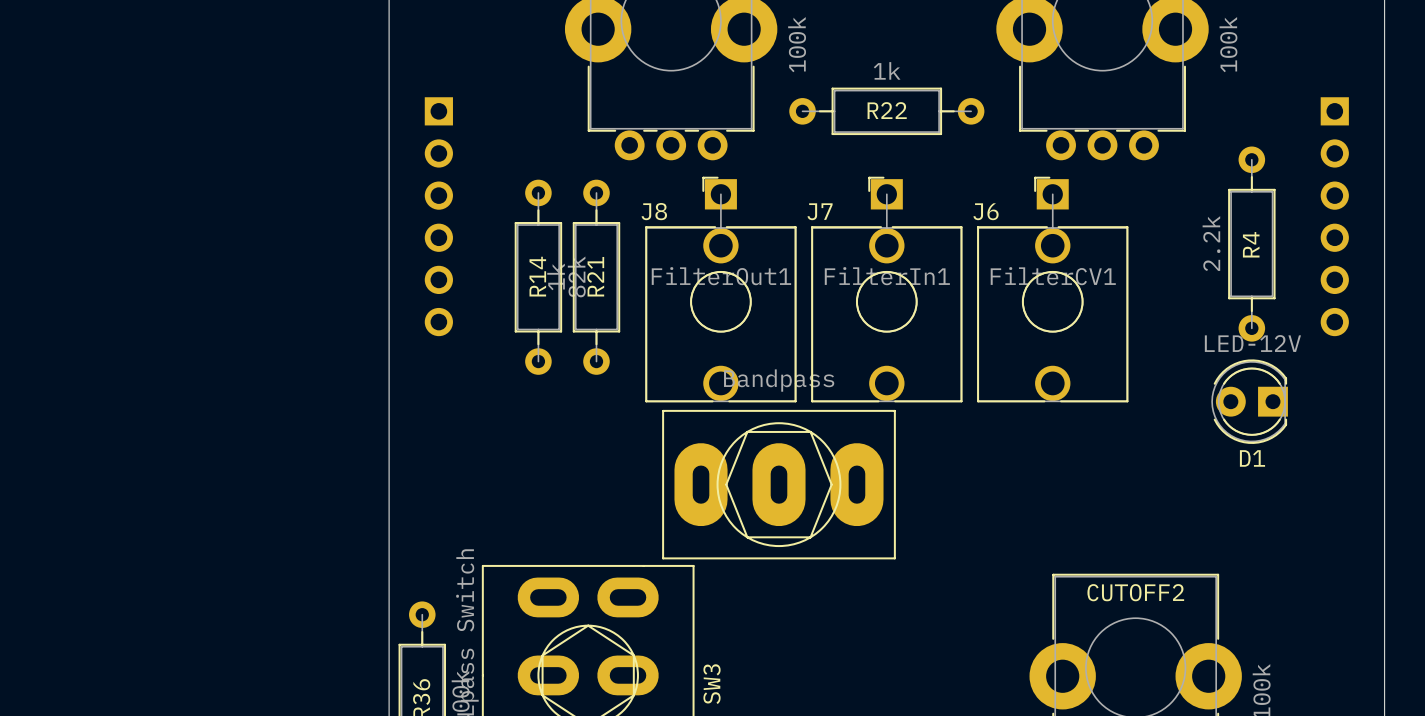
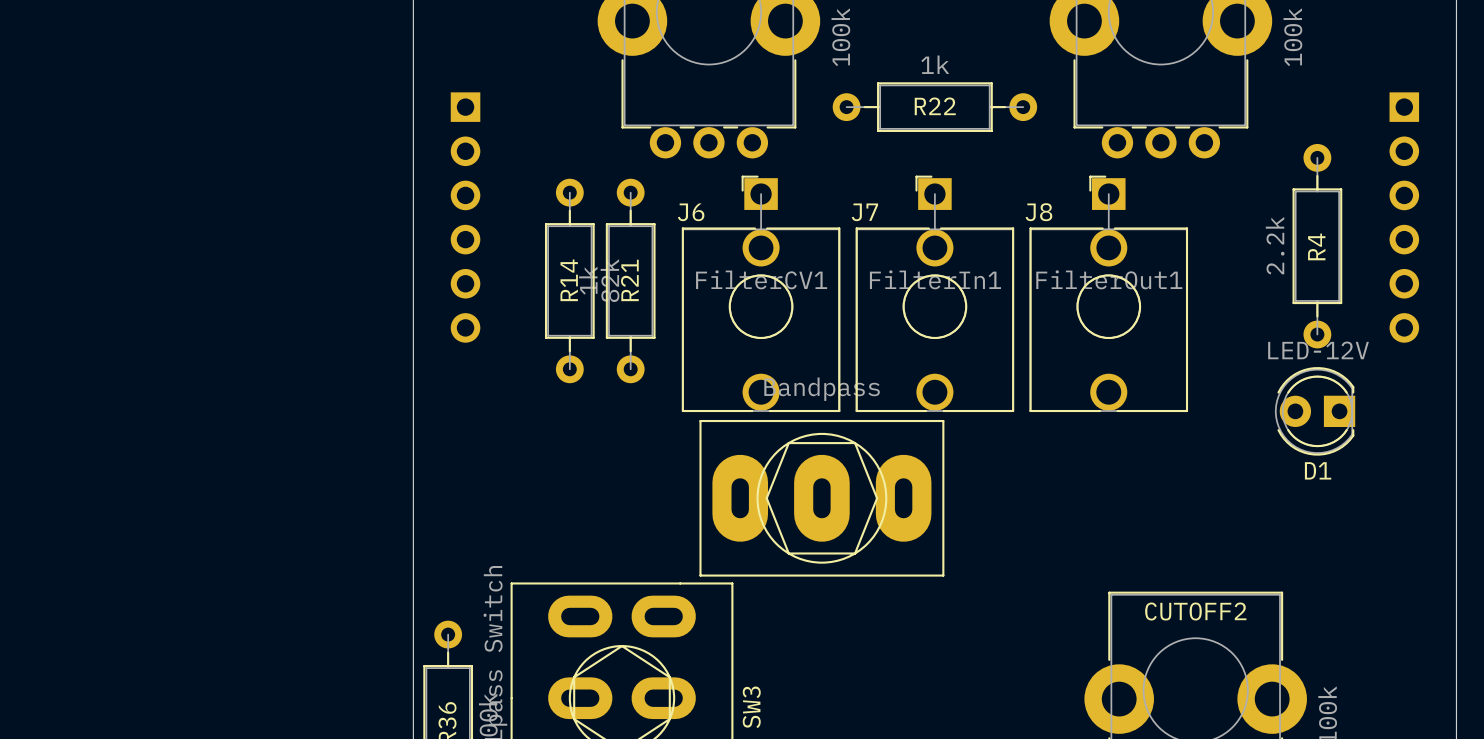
J8 name: J8 (654, 211) -> J6 (691, 212)
J6 name: J6 (986, 211) -> J8 (1038, 212)
J8 value: FilterOut1 (721, 276) -> FilterCV1 (761, 279)
J6 value: FilterCV1 (1053, 276) -> FilterOut1 (1109, 279)

